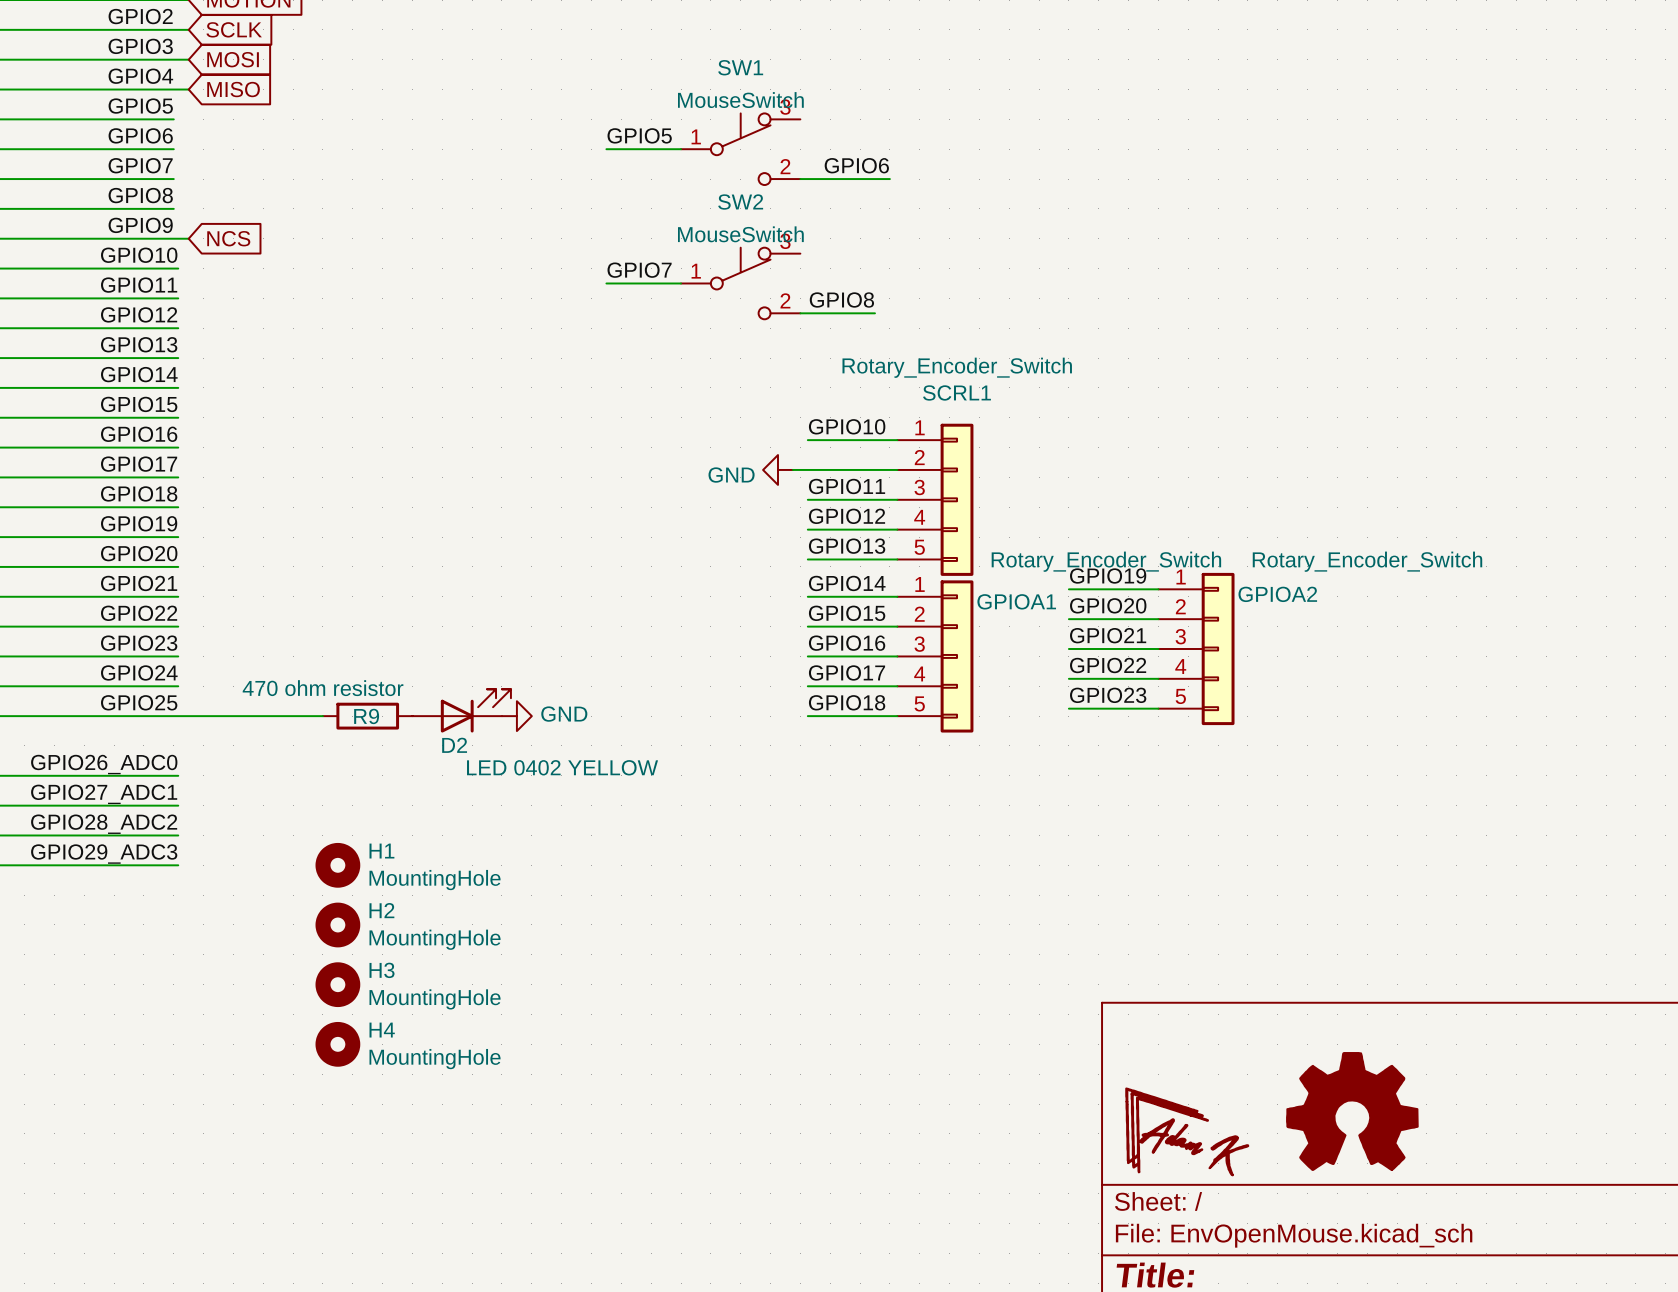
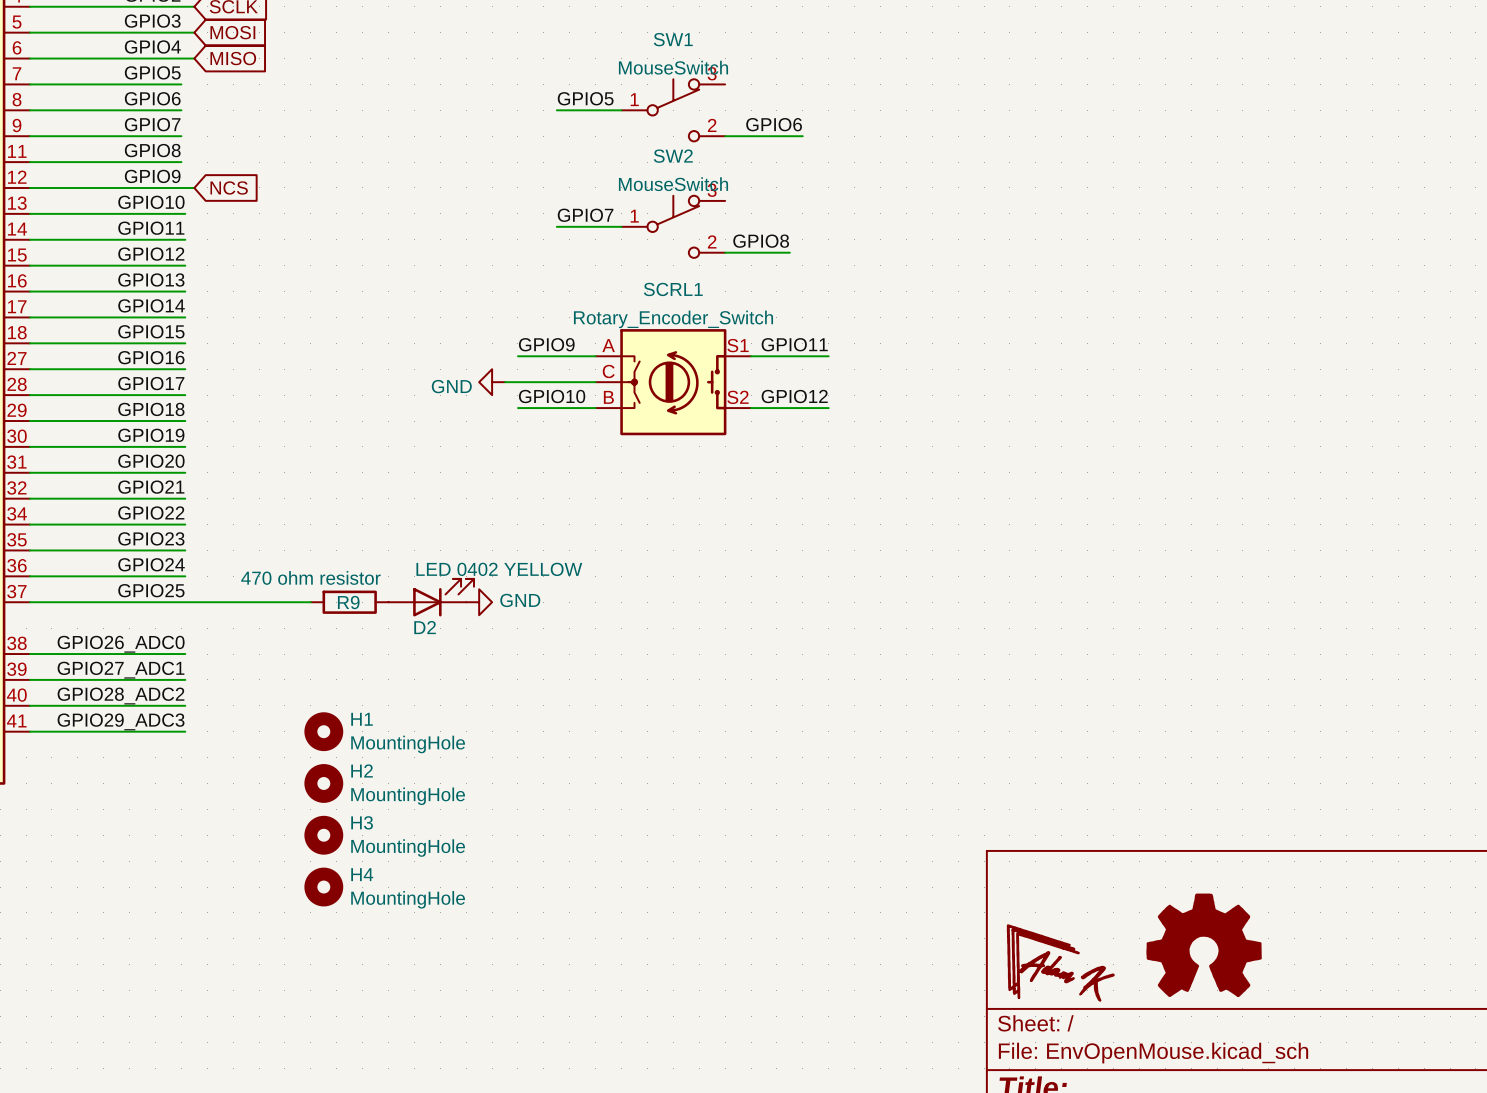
SCRL1 value position: Rotary_Encoder_Switch (957, 367) -> Rotary_Encoder_Switch (673, 319)
label: none -> GPIO9 (546, 344)
SCRL1 symbol: [897, 423, 974, 576] -> [595, 329, 752, 436]
label position: GPIO10 (847, 426) -> GPIO10 (552, 396)
wire: (807, 440) (897, 440) -> (517, 356) (595, 356)
power symbol position: GND (778, 469) -> GND (492, 382)
wire: (792, 469) (897, 469) -> (505, 382) (595, 382)
label position: GPIO11 (847, 486) -> GPIO11 (794, 344)
wire: (807, 499) (897, 499) -> (517, 408) (595, 408)
label position: GPIO12 (847, 516) -> GPIO12 (794, 396)
wire: (807, 529) (897, 529) -> none
label: GPIO13 (847, 546) -> none
wire: (807, 559) (897, 559) -> (751, 408) (828, 408)
label: GPIO19 (1108, 576) -> none
label: GPIO14 (847, 583) -> none
wire: (1068, 589) (1158, 589) -> none
wire: (807, 596) (897, 596) -> (751, 356) (828, 356)
label: GPIO20 (1108, 605) -> none
label: GPIO15 (847, 613) -> none
wire: (1068, 619) (1158, 619) -> none
wire: (807, 626) (897, 626) -> none
label: GPIO21 (1108, 635) -> none
label: GPIO16 (847, 643) -> none
wire: (1068, 648) (1158, 648) -> none
GPIOA2: Rotary_Encoder_Switch (1196, 648) -> none
wire: (807, 656) (897, 656) -> none
GPIOA1: Rotary_Encoder_Switch (935, 656) -> none
label: GPIO22 (1108, 665) -> none
label: GPIO17 (847, 672) -> none
wire: (1068, 678) (1158, 678) -> none
wire: (807, 686) (897, 686) -> none
label: GPIO23 (1108, 695) -> none
label: GPIO18 (847, 702) -> none
wire: (1068, 708) (1158, 708) -> none
wire: (807, 716) (897, 716) -> none
D2 value position: LED 0402 YELLOW (562, 767) -> LED 0402 YELLOW (499, 569)

